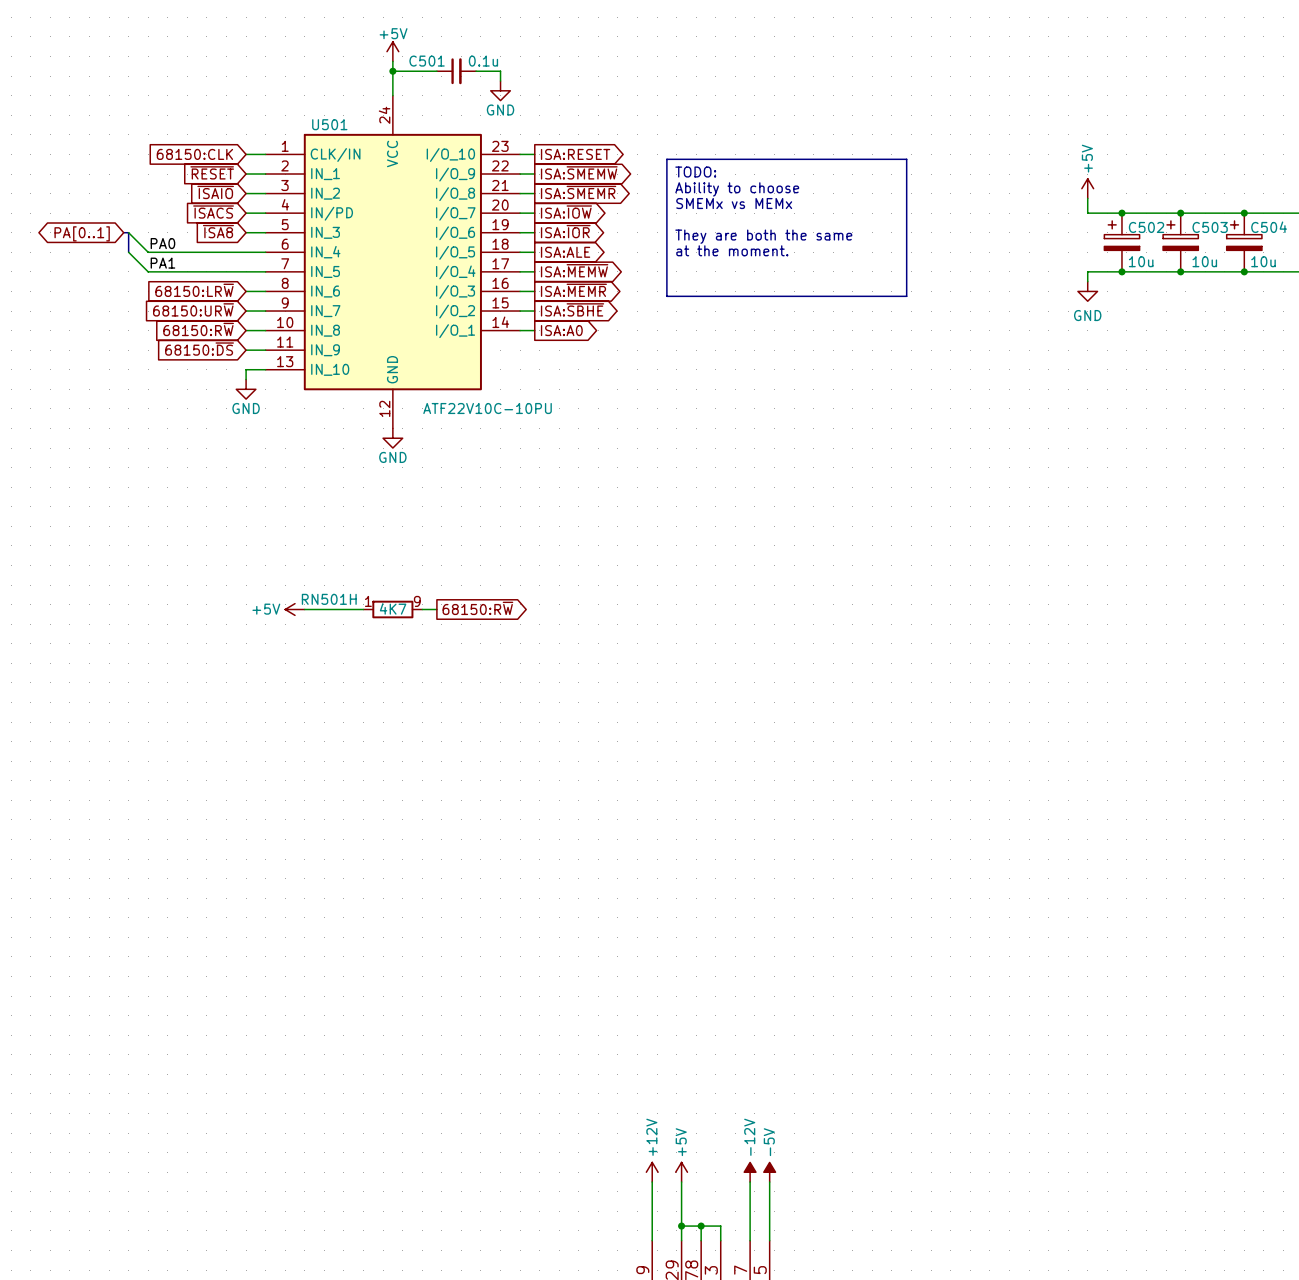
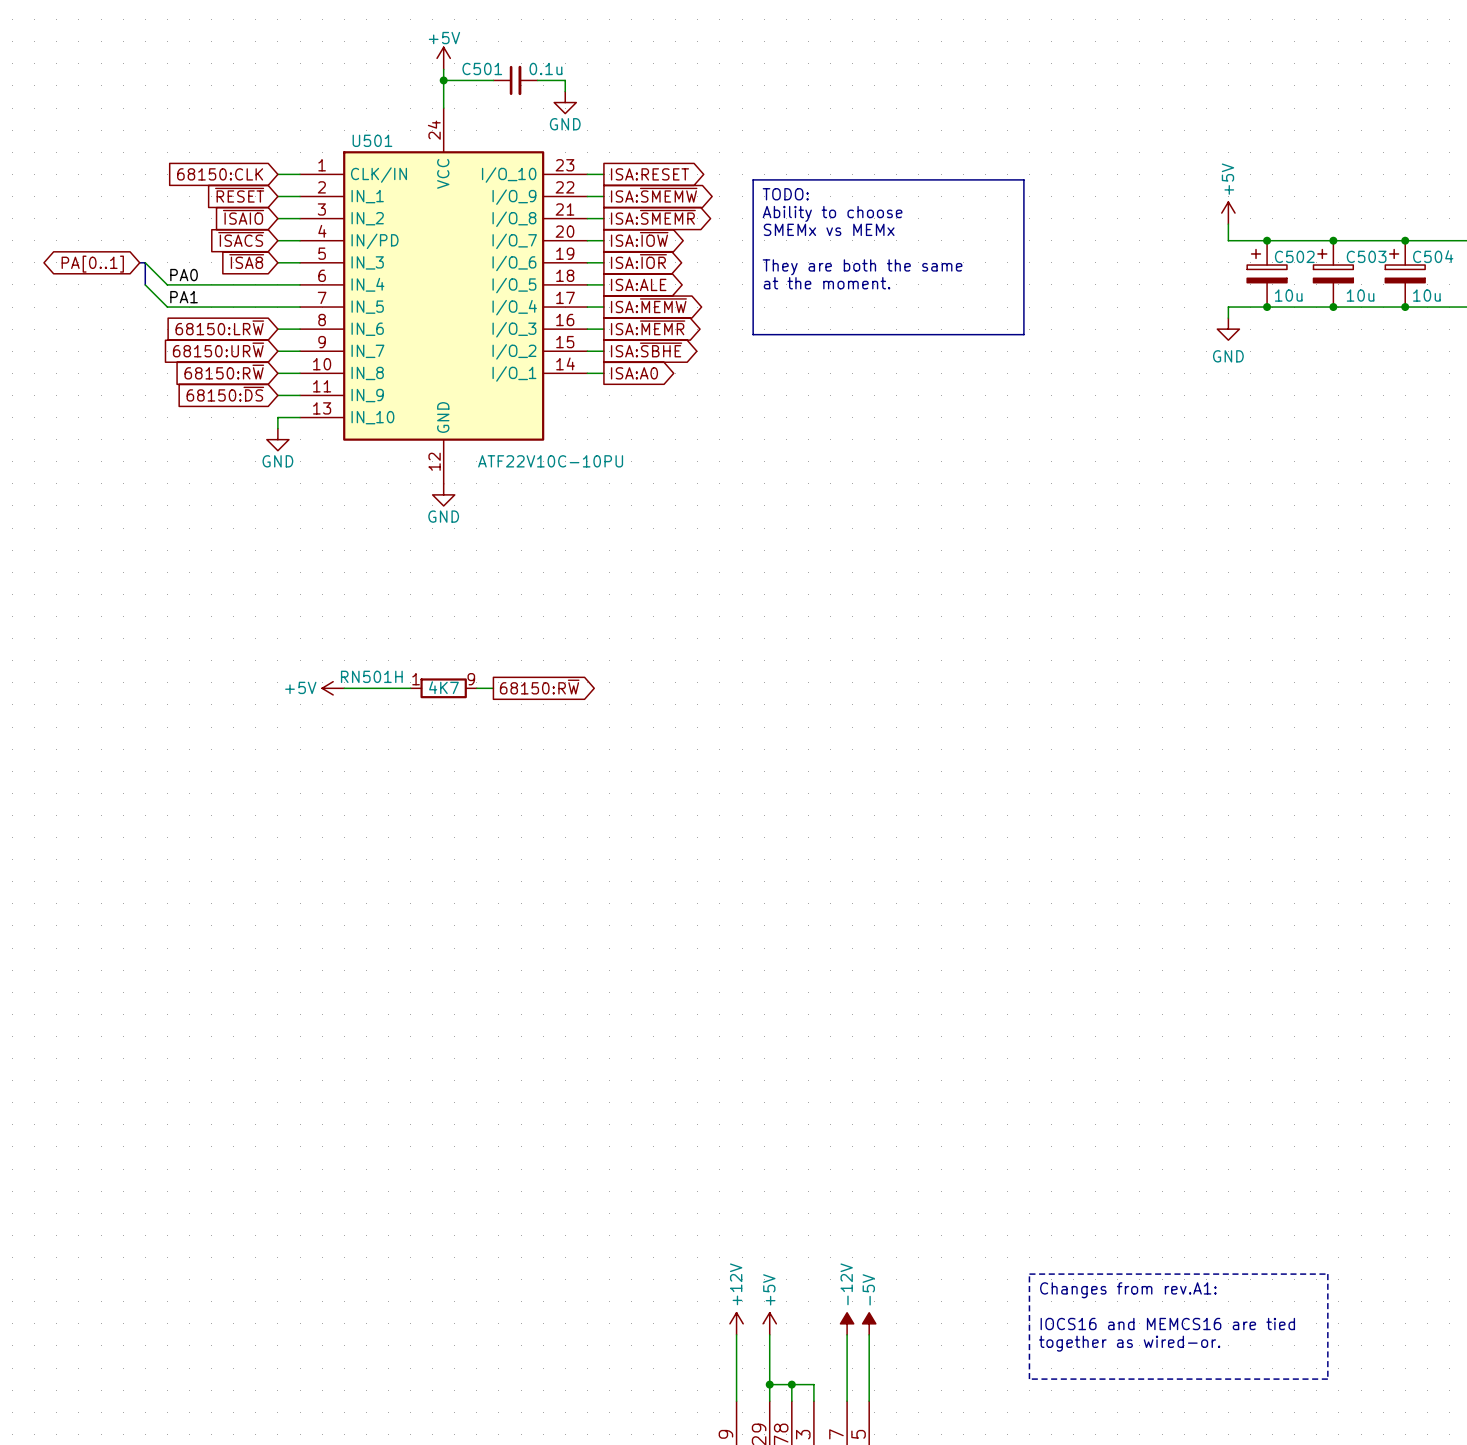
line: none -> (1029, 1274) (1327, 1274) (1327, 1379) (1029, 1379) (1029, 1274)
text: none -> Changes from rev.A1: (1128, 1290)
text: none -> IOCS16 and MEMCS16 are tied (1167, 1324)
text: none -> together as wired-or. (1129, 1343)

